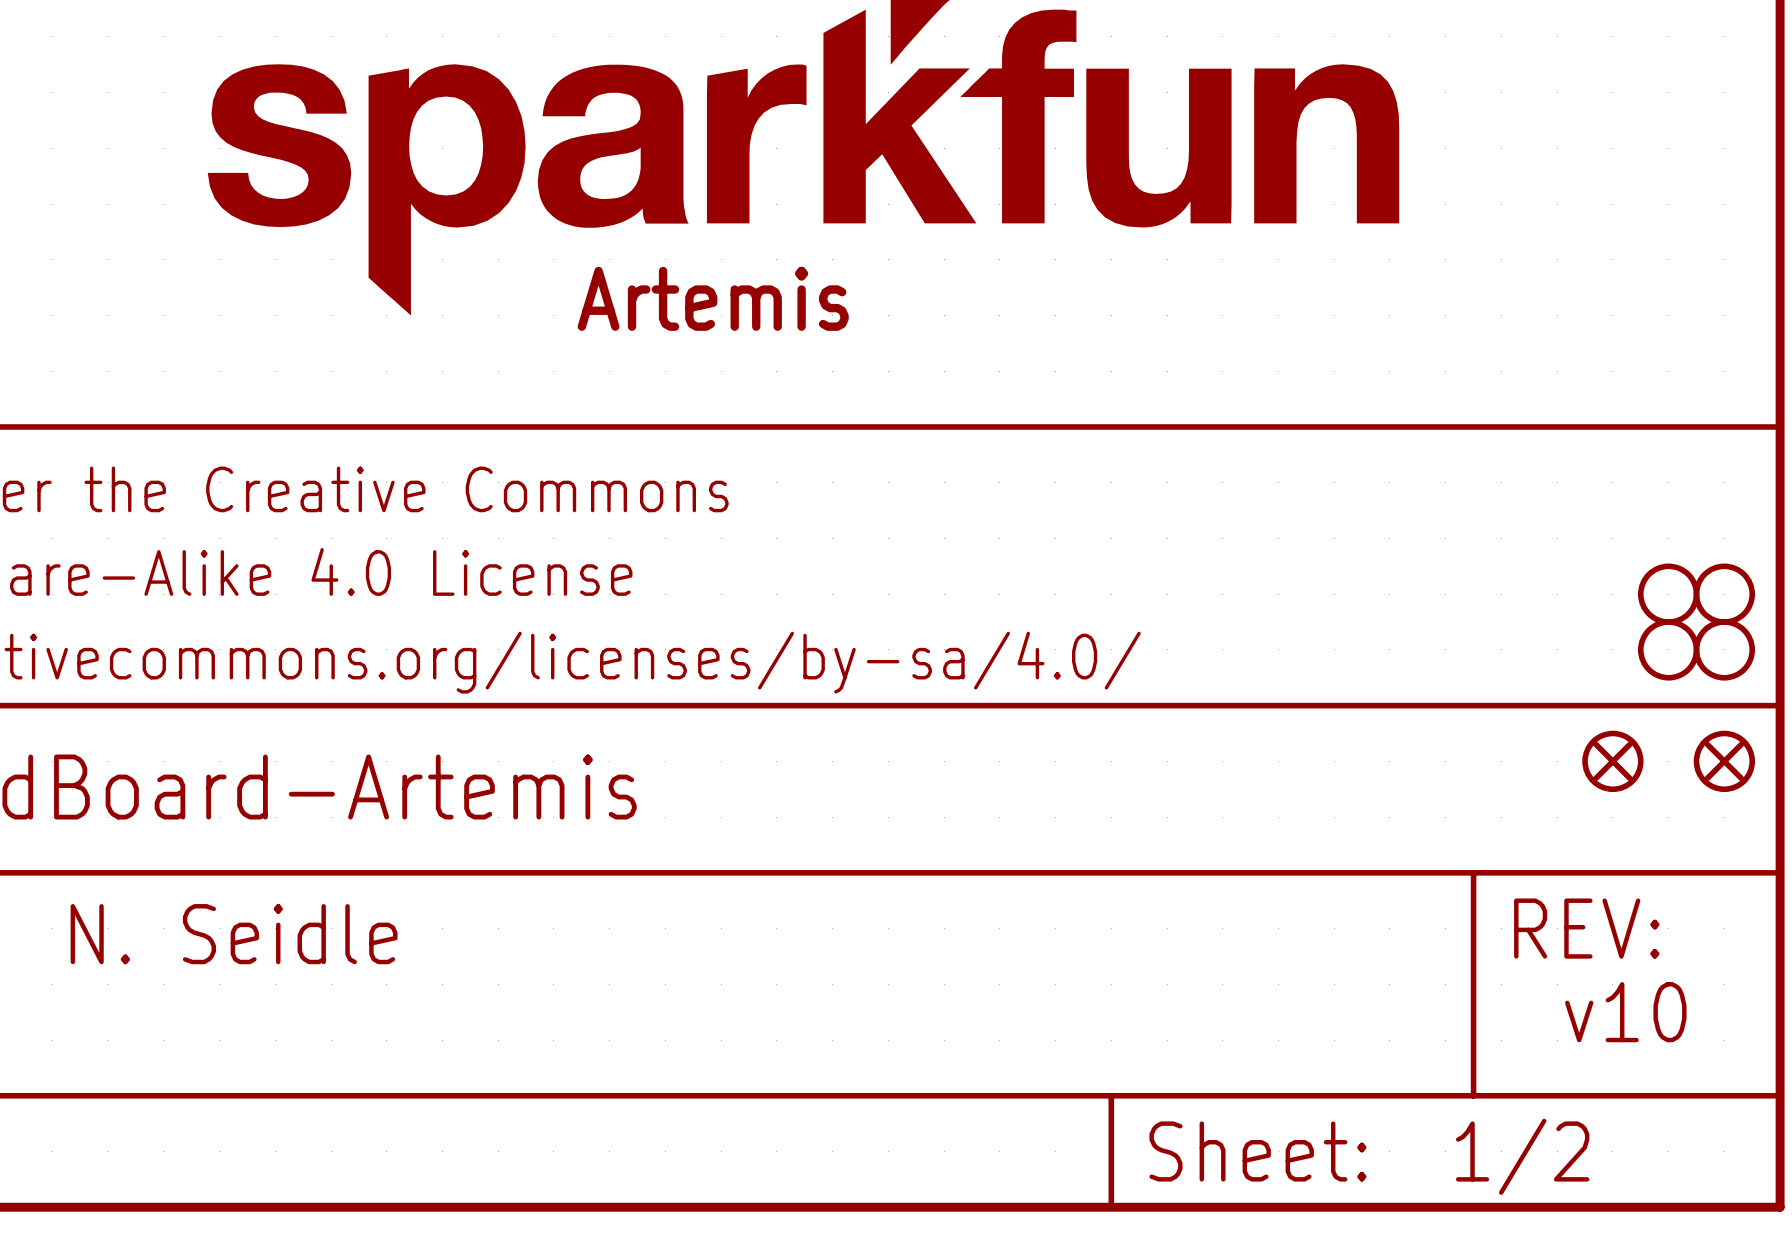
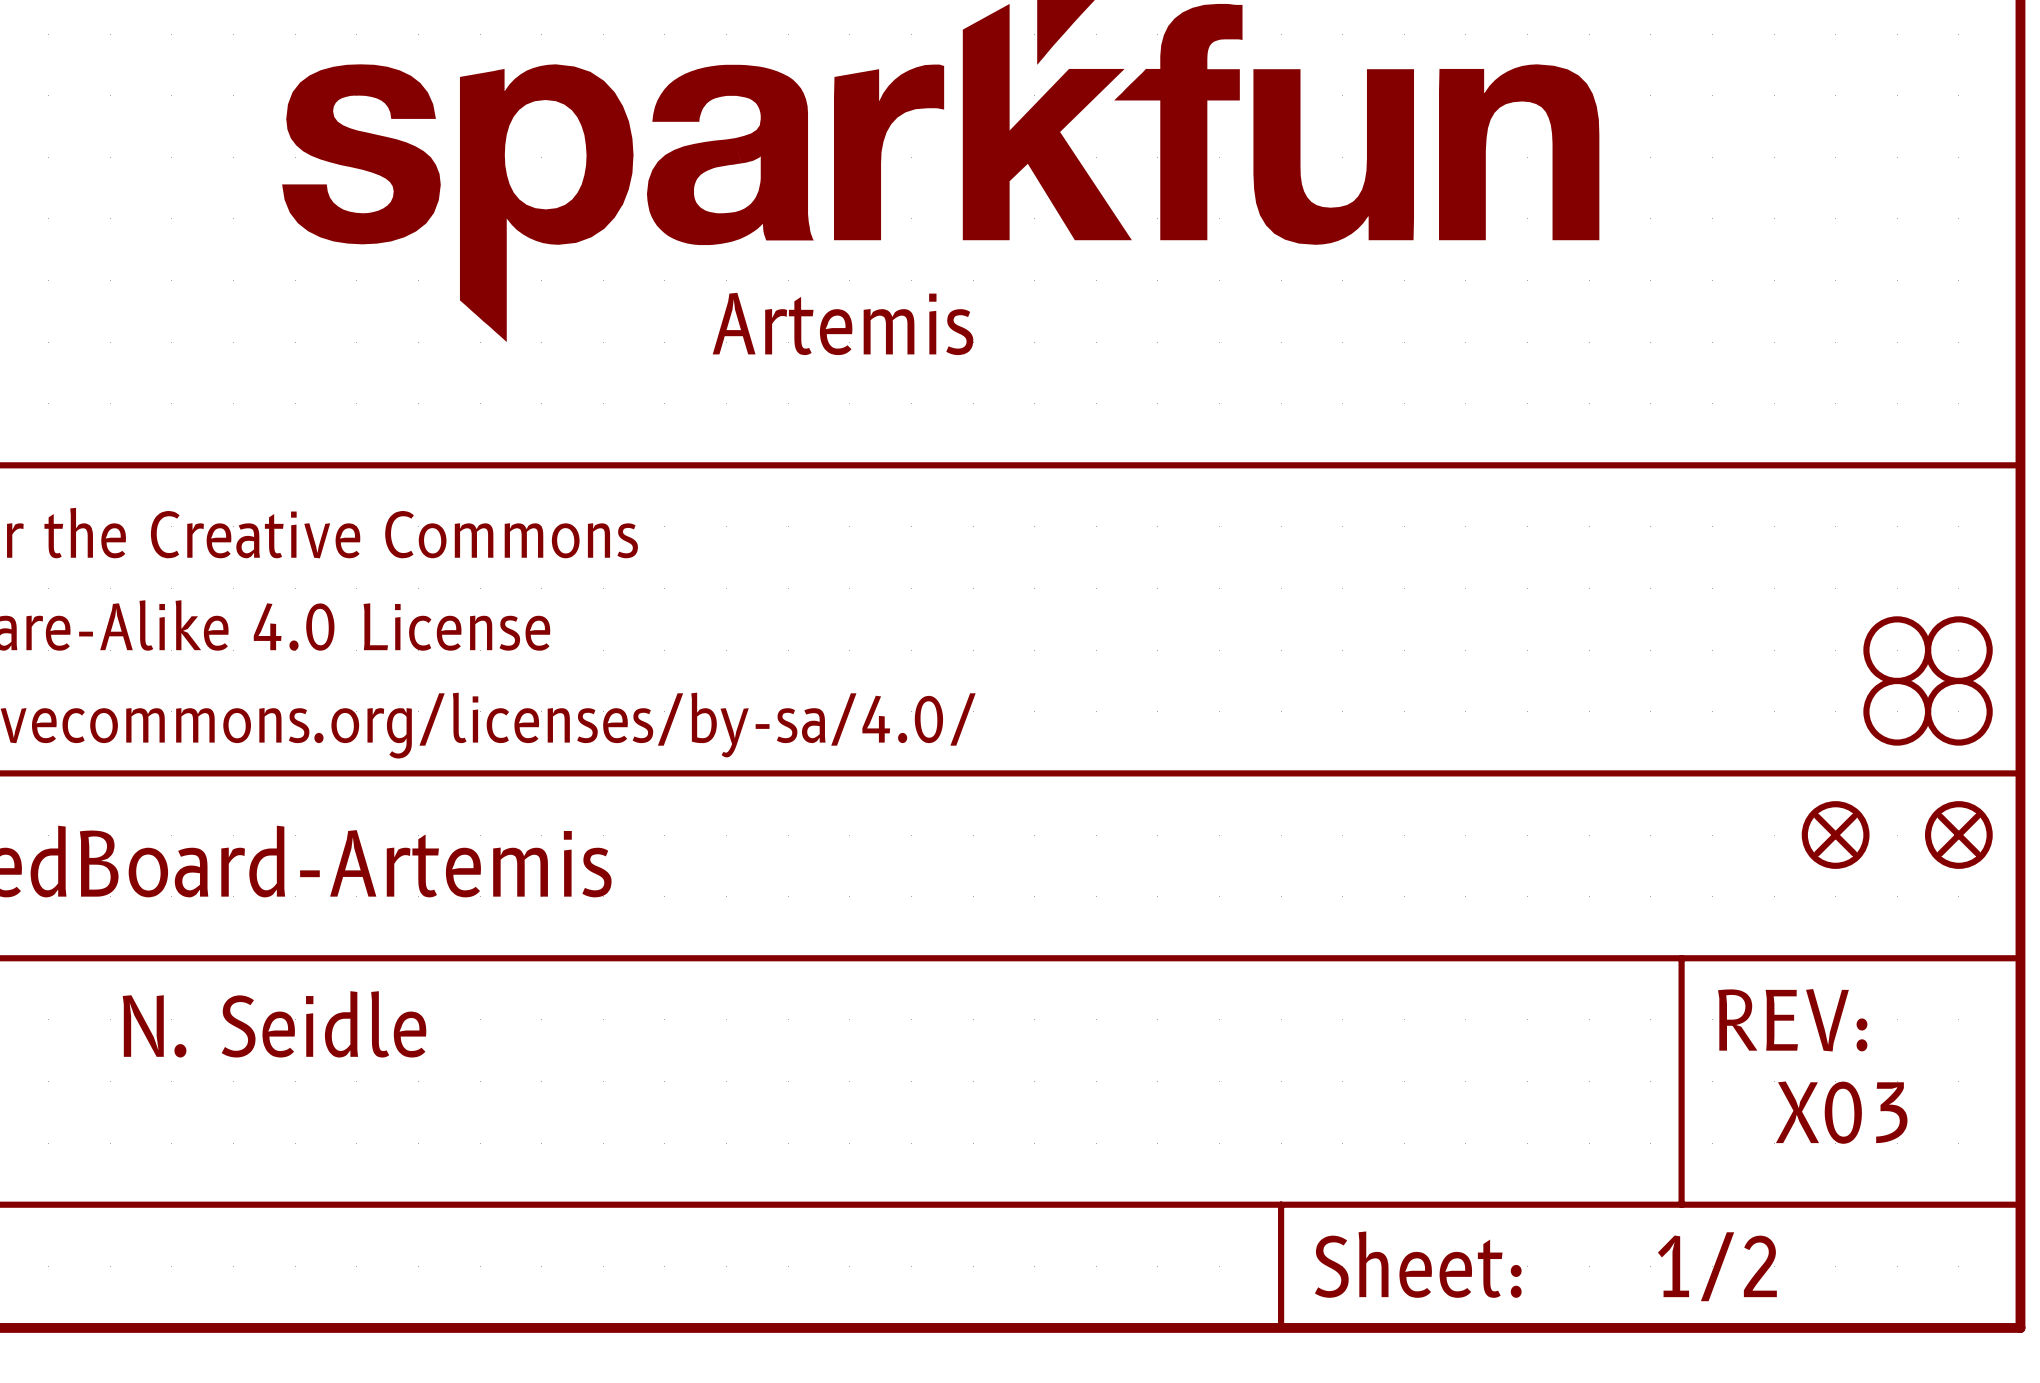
text: v10 (1625, 1012) -> X03 (1841, 1112)

